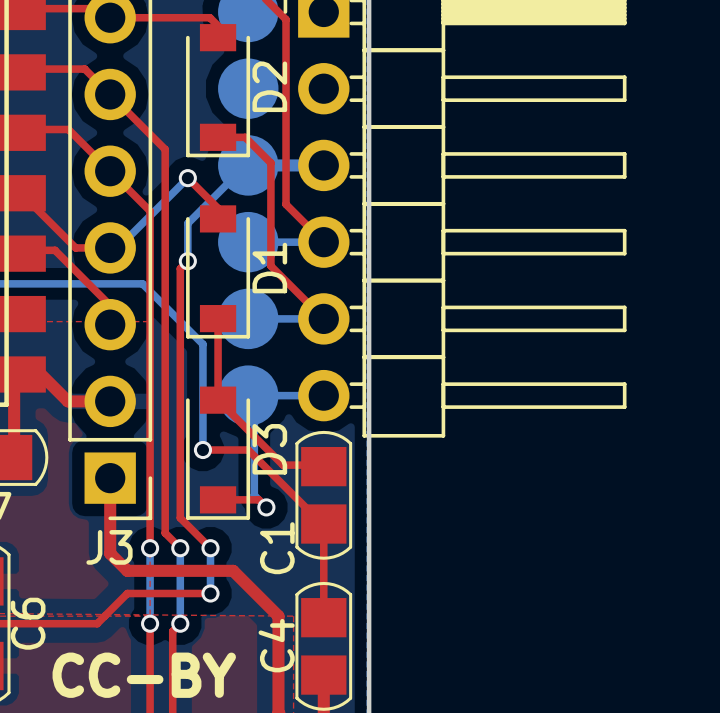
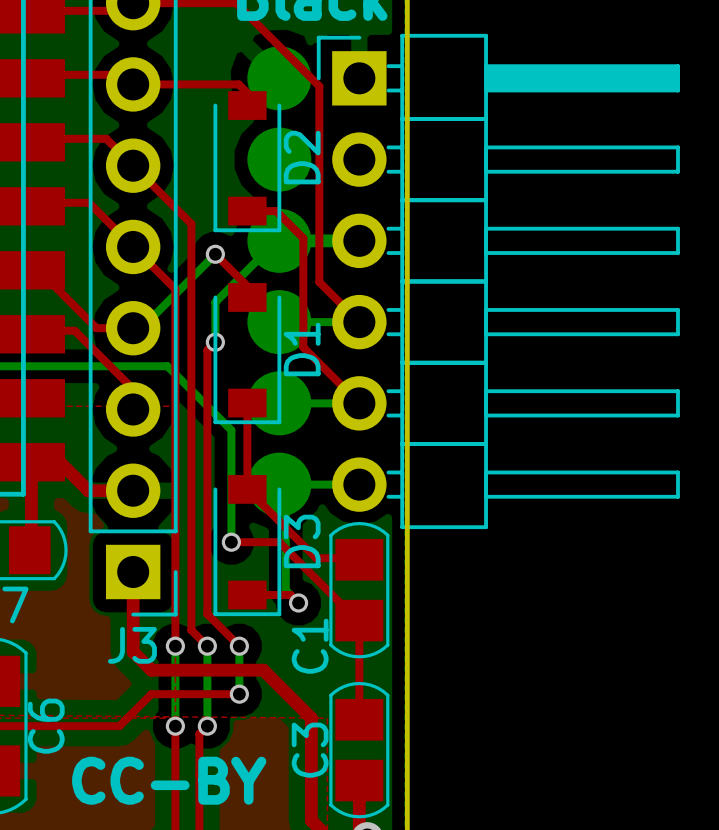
C4 name: C4 (276, 645) -> C3 (310, 750)

